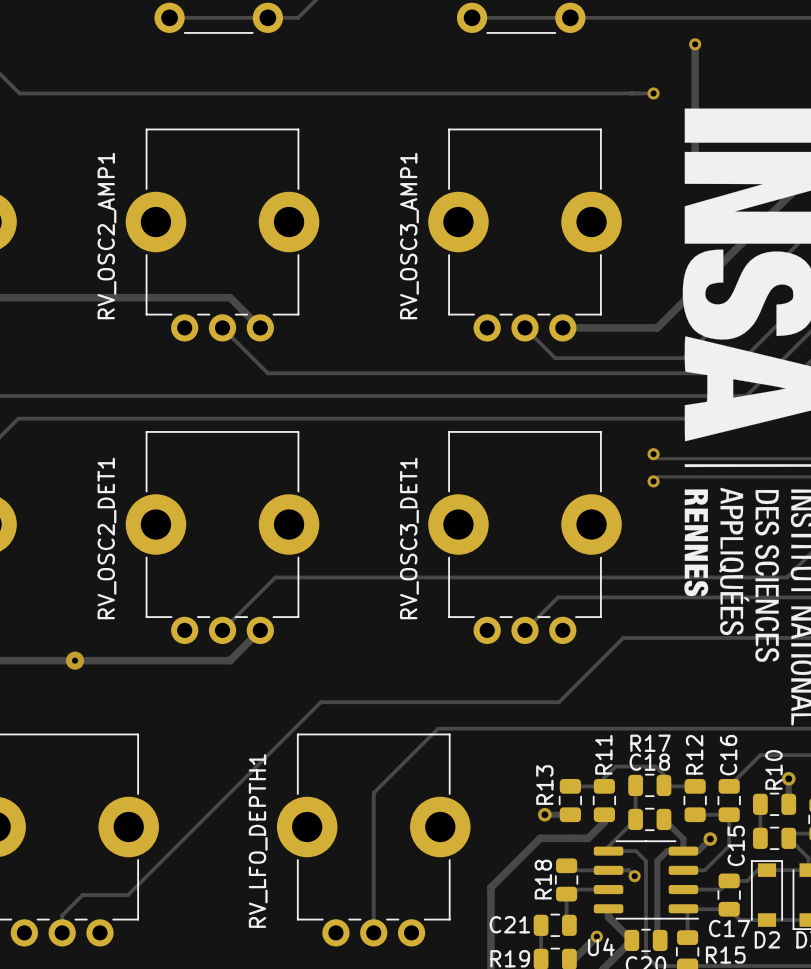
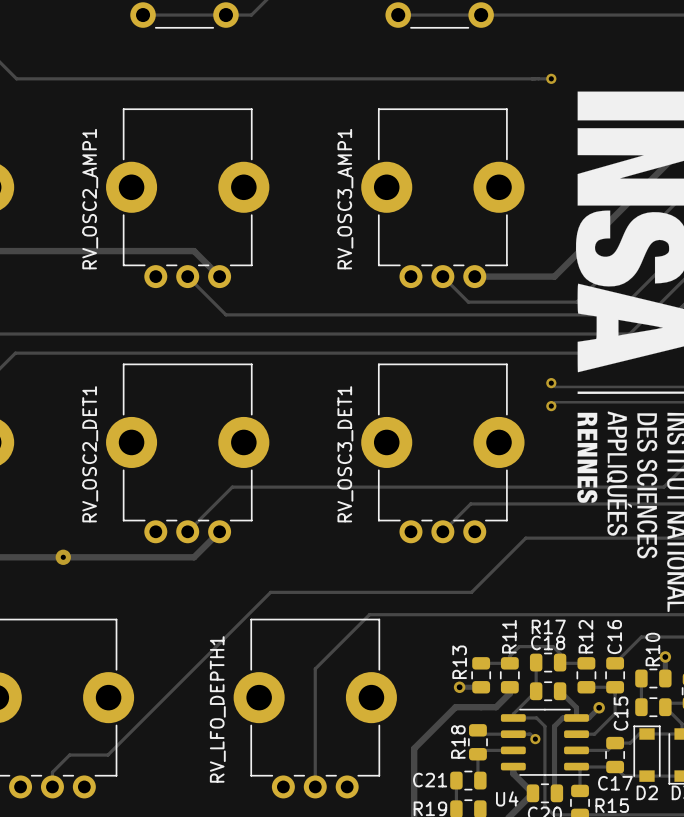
track: (695, 44) (695, 172) -> none
via: (695, 44) -> none
track: (596, 936) (574, 959) (569, 959) -> none
via: (596, 936) -> none

